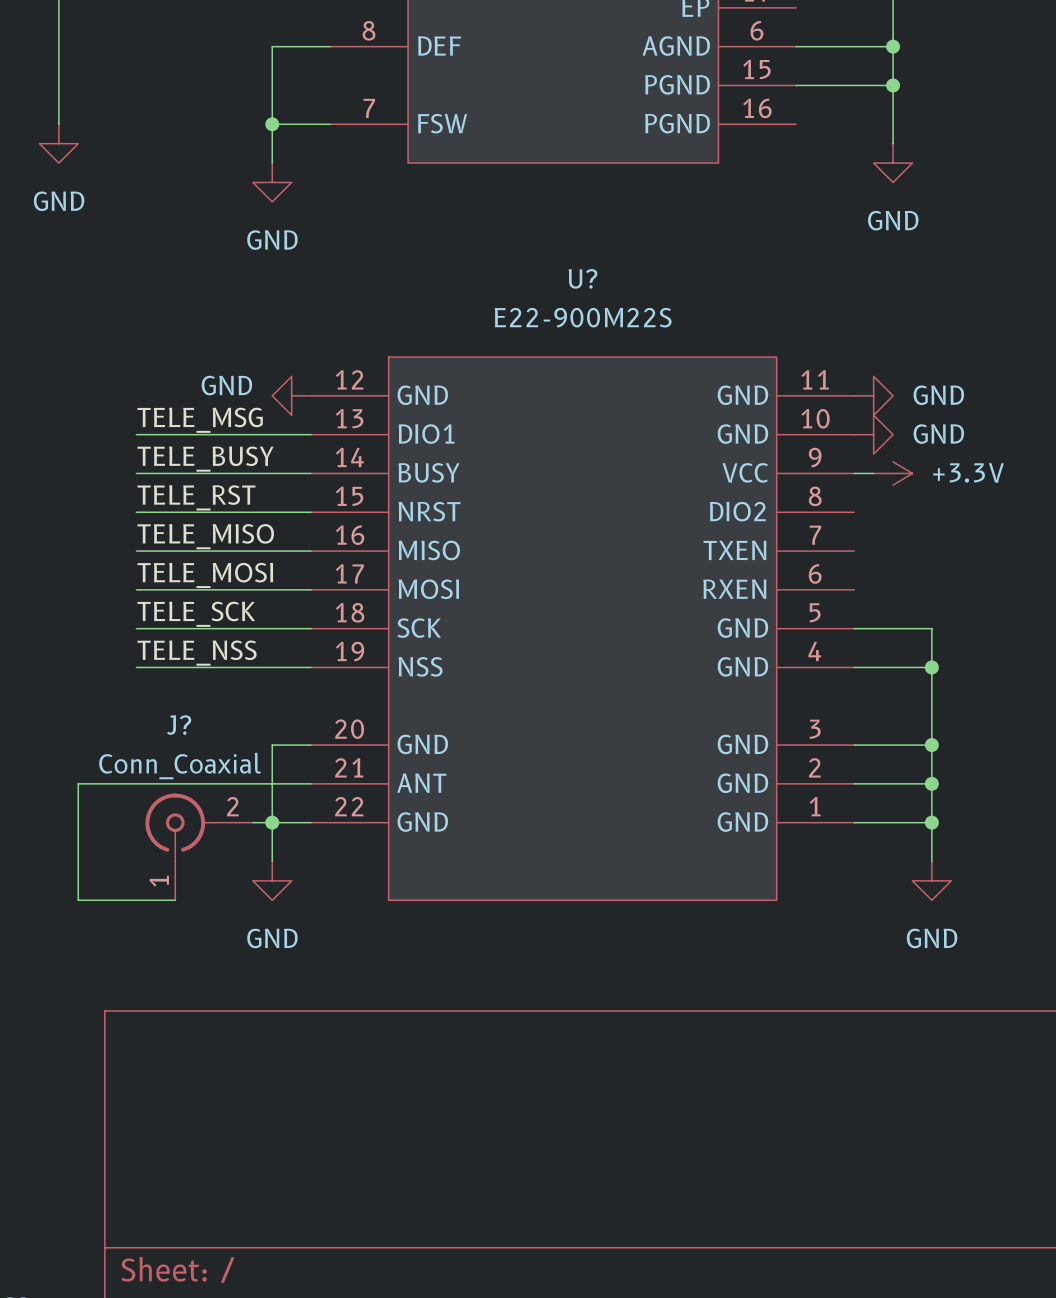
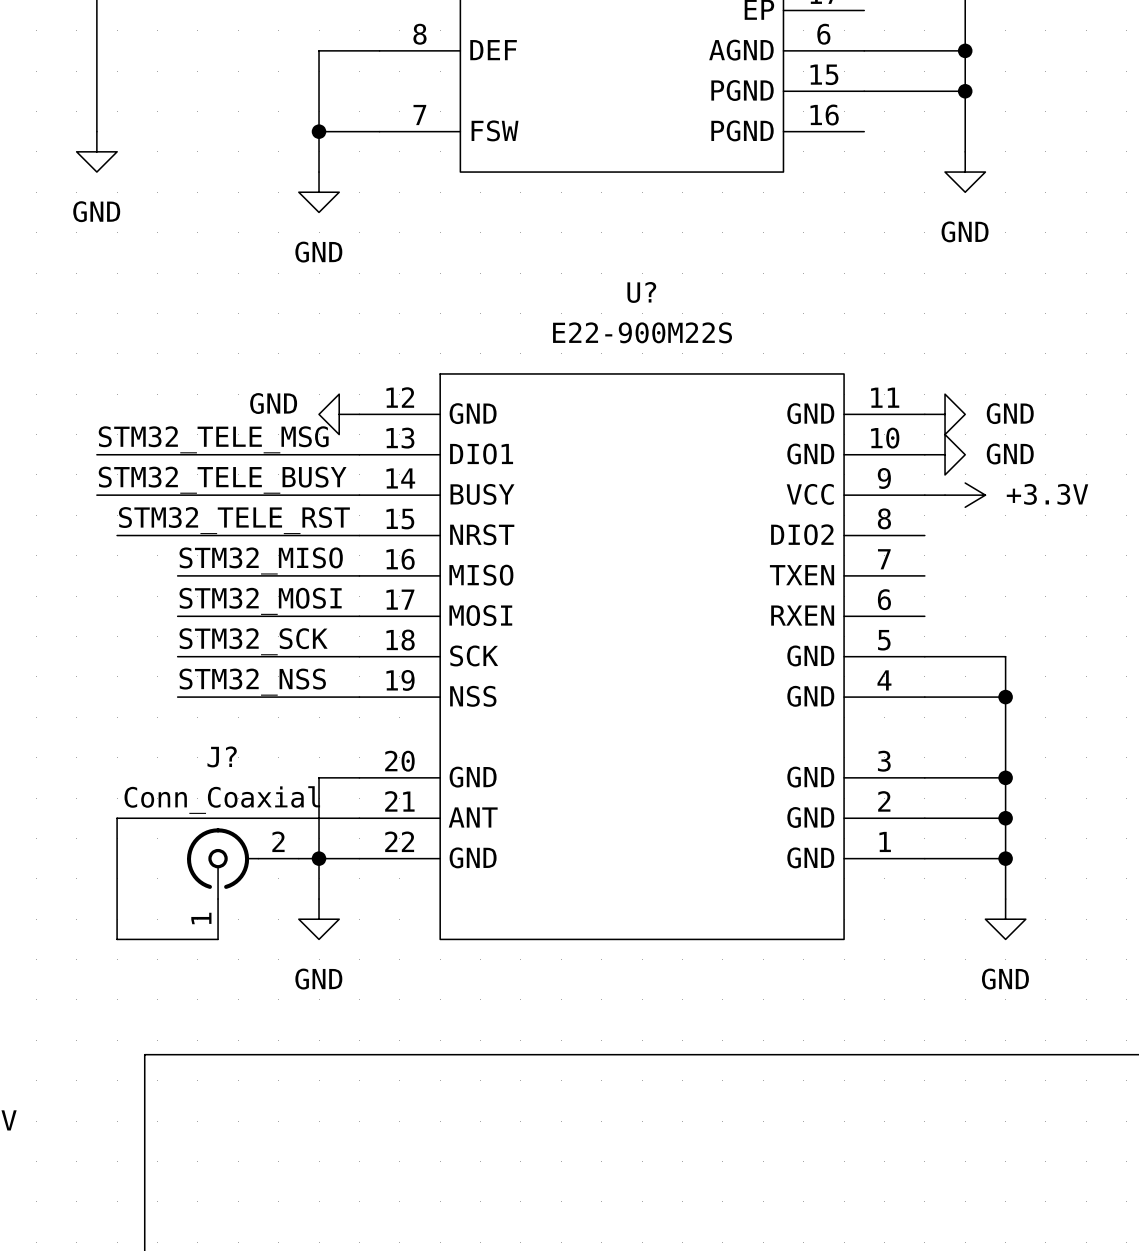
label: TELE_MSG (200, 420) -> STM32_TELE_MSG (213, 439)
wire: none -> (96, 454) (177, 454)
label: TELE_BUSY (205, 459) -> STM32_TELE_BUSY (222, 480)
wire: none -> (96, 495) (177, 495)
label: TELE_RST (196, 497) -> STM32_TELE_RST (234, 520)
wire: none -> (117, 535) (177, 535)
label: TELE_MISO (205, 536) -> STM32_MISO (261, 560)
label: TELE_MOSI (205, 575) -> STM32_MOSI (260, 601)
label: TELE_SCK (196, 614) -> STM32_SCK (253, 641)
label: TELE_NSS (197, 653) -> STM32_NSS (252, 682)

